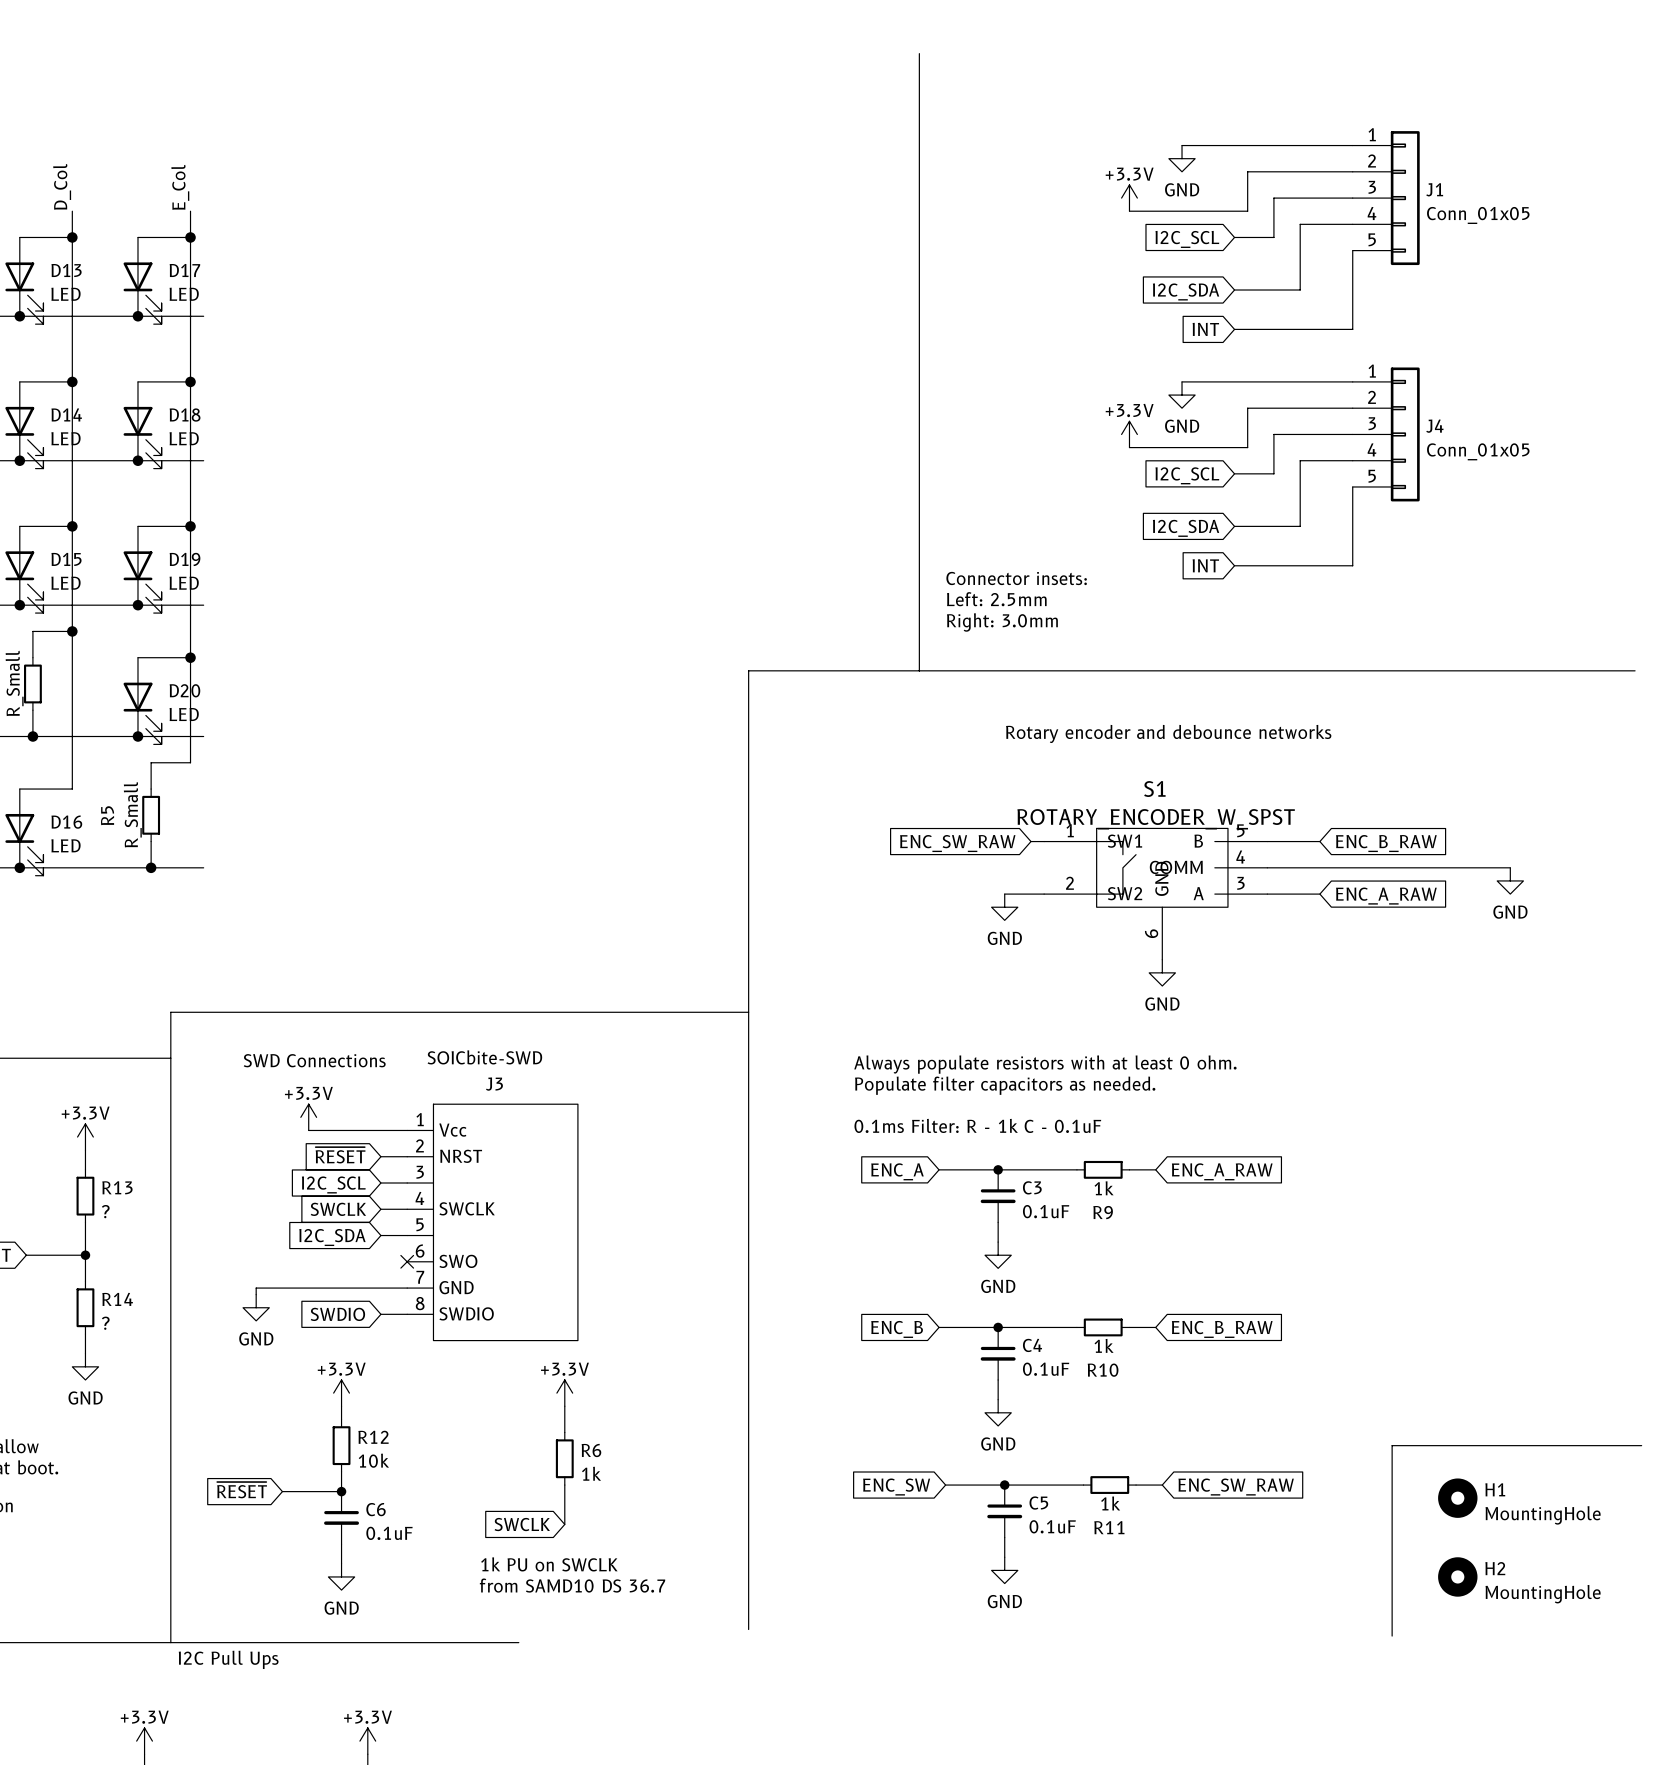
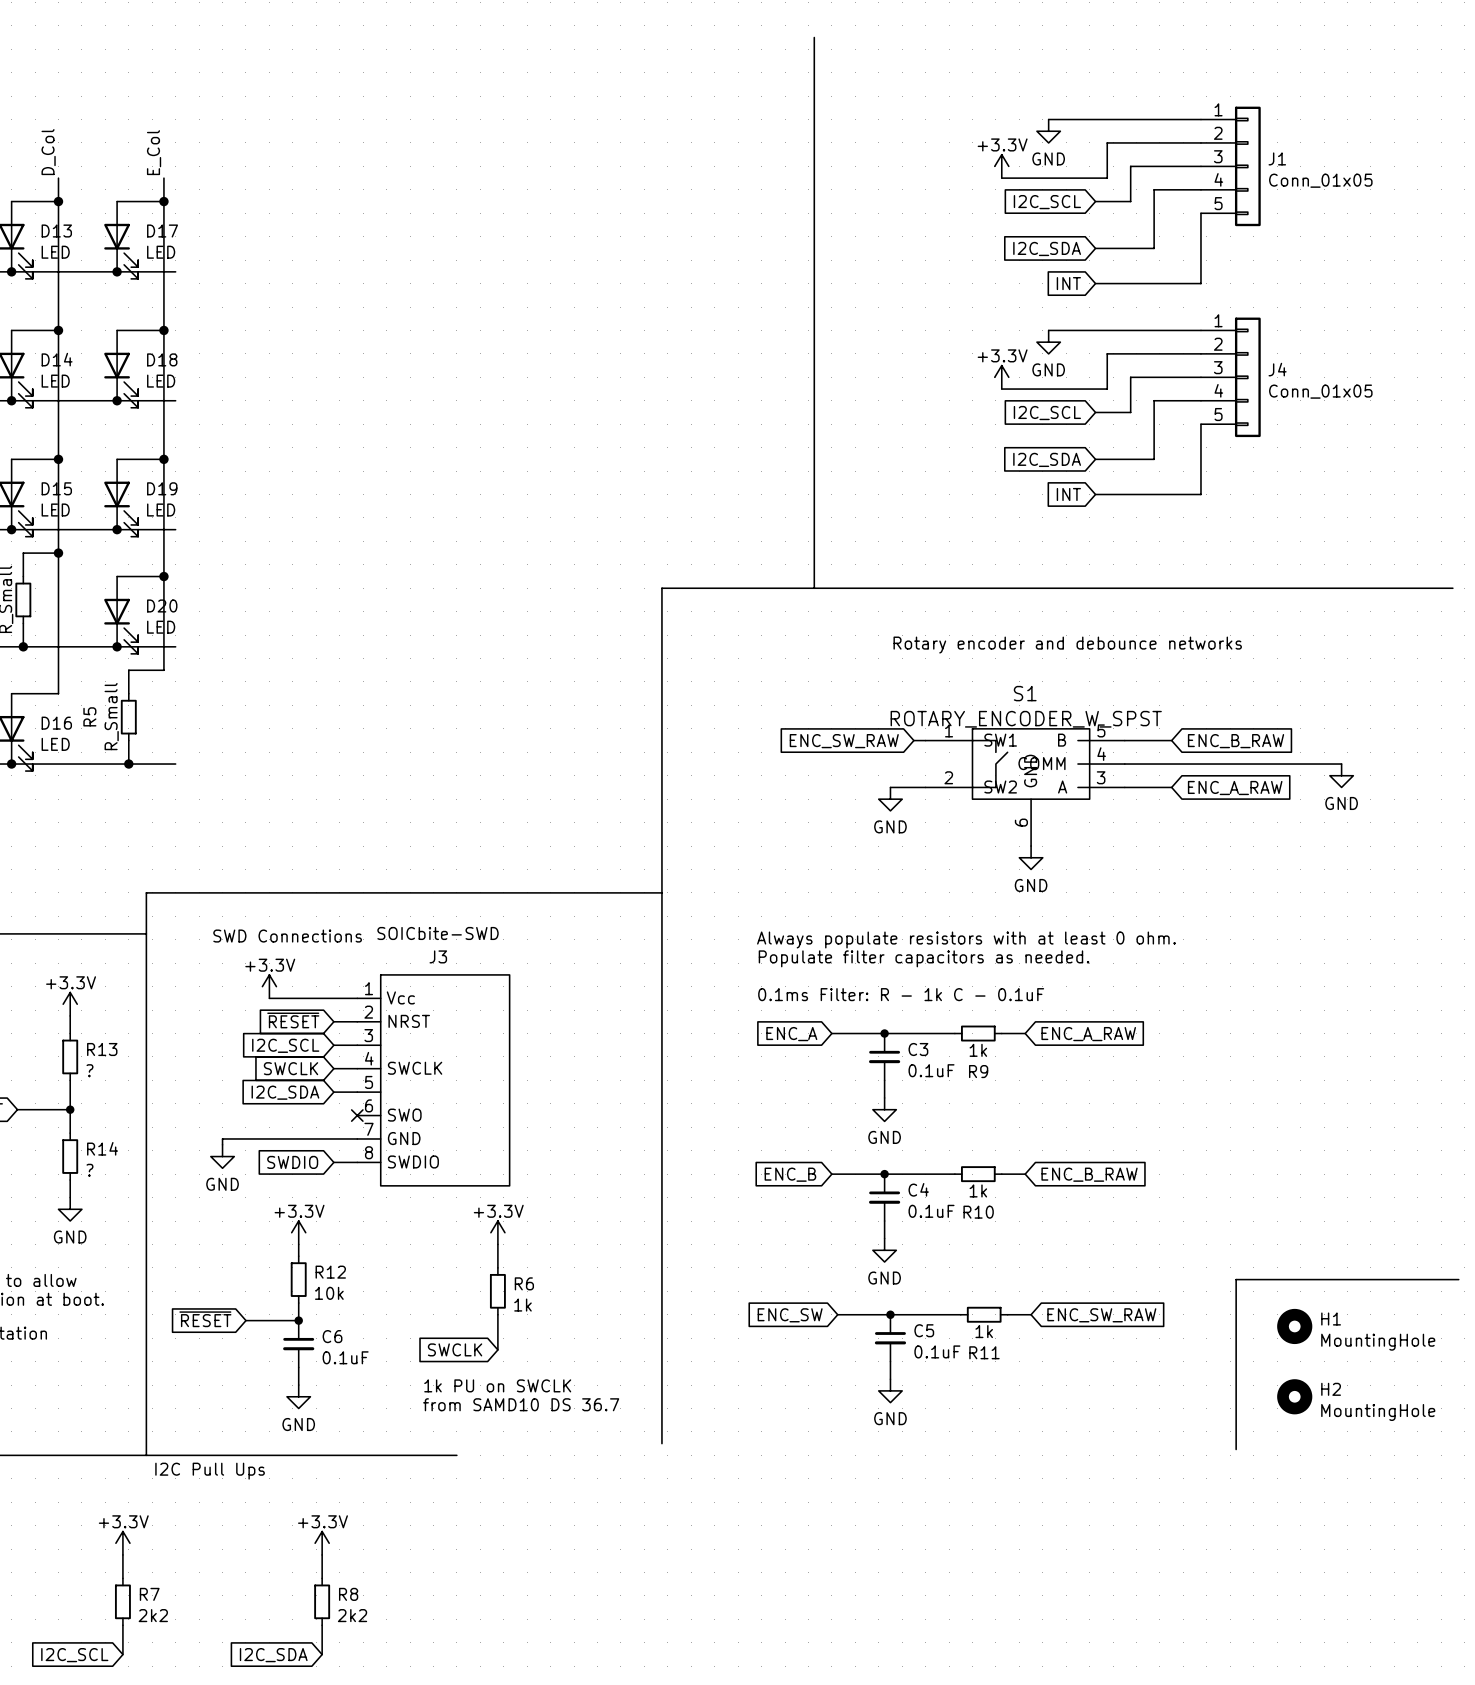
text: Connector insets: (1016, 578) -> none
text: Left: 2.5mm (996, 599) -> none
text: Right: 3.0mm (1002, 622) -> none

